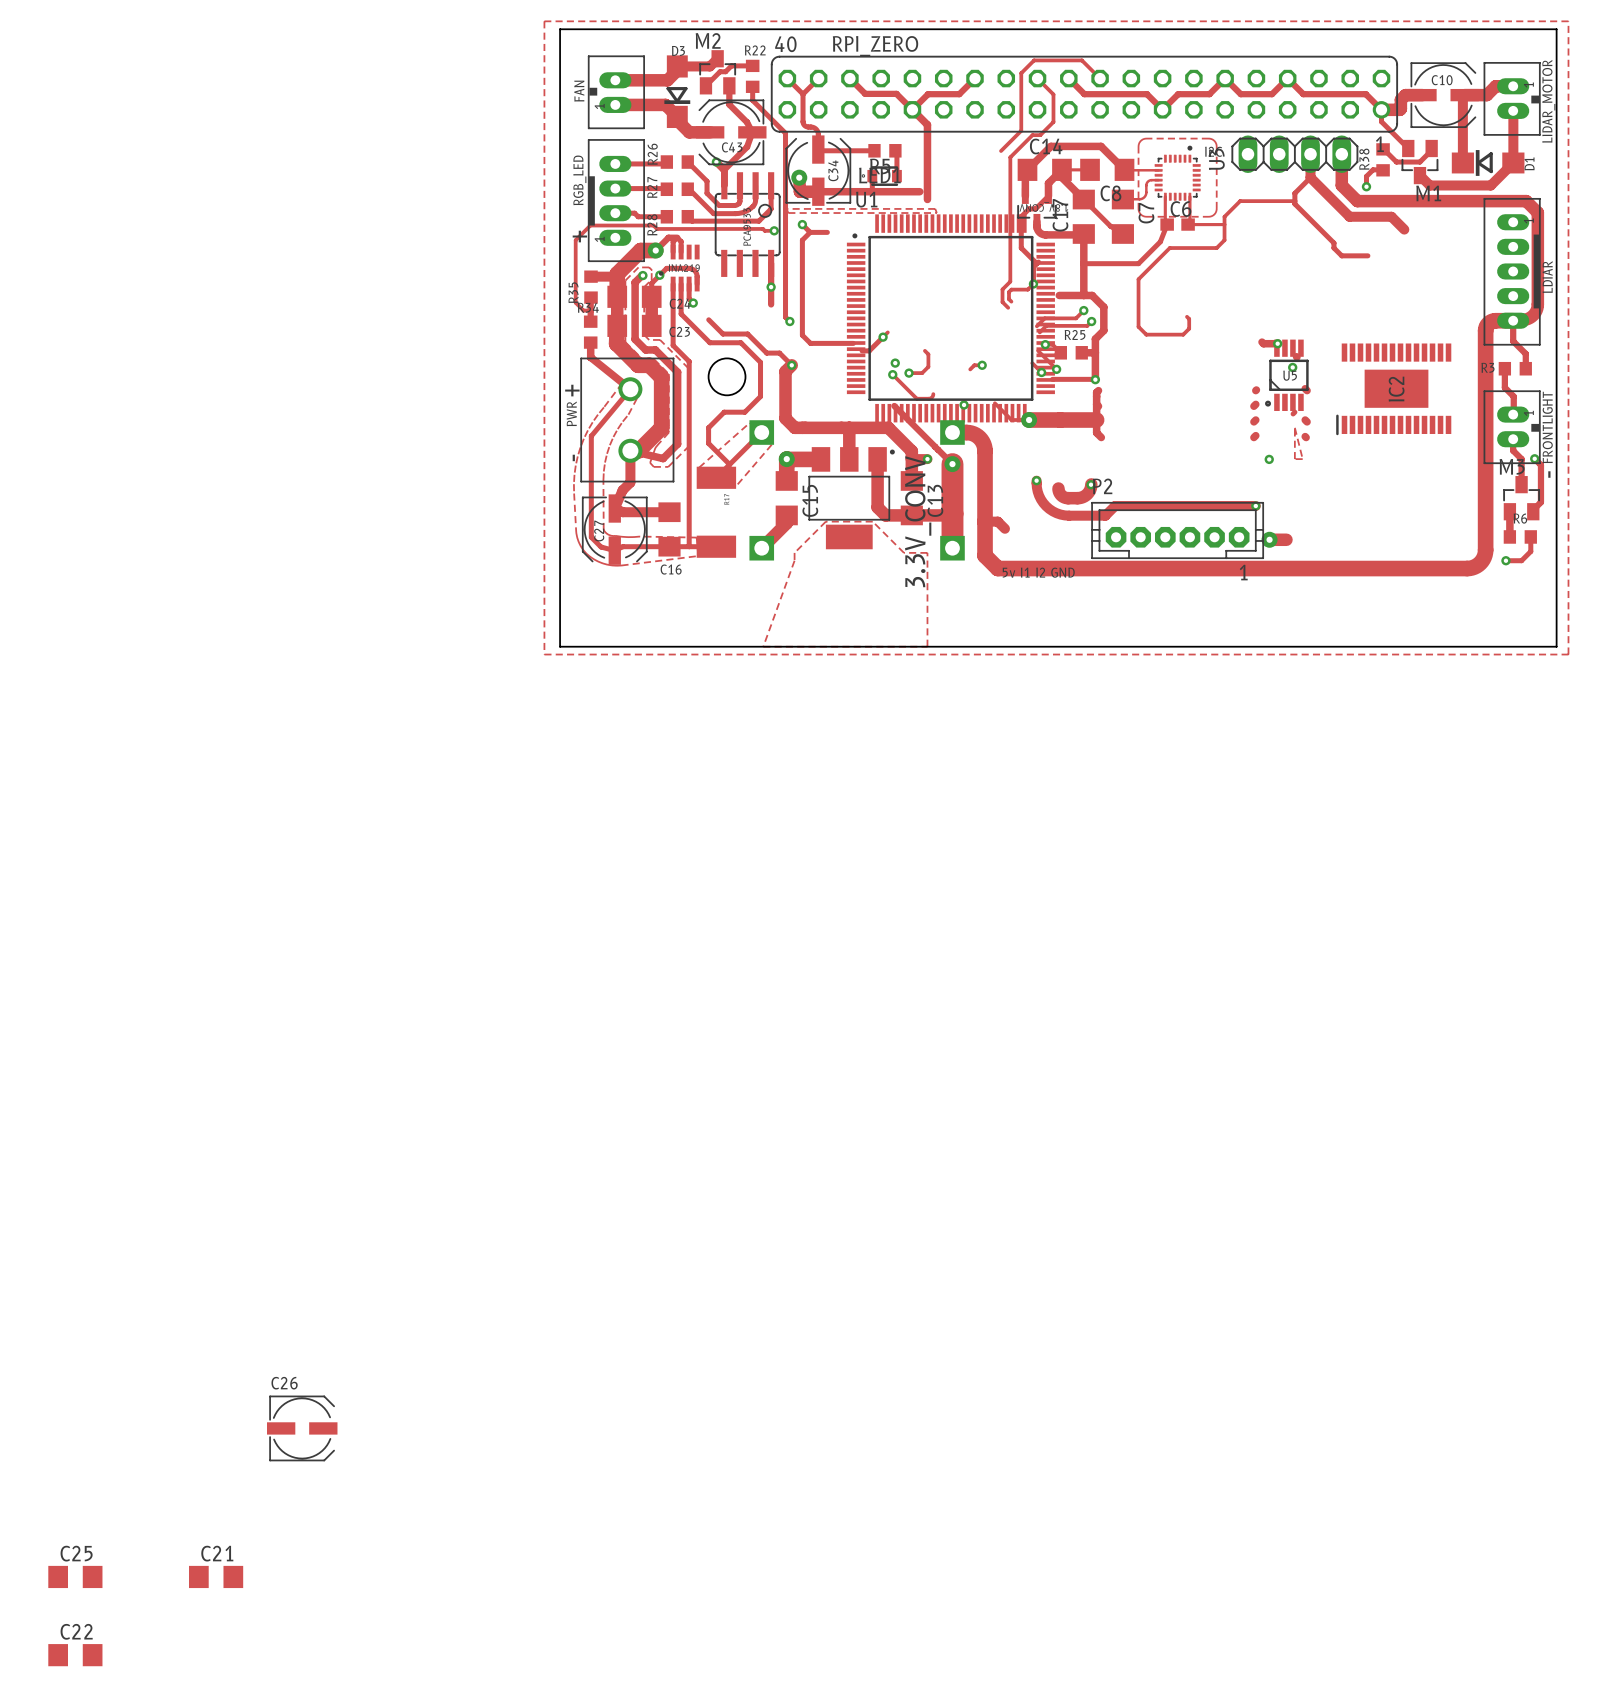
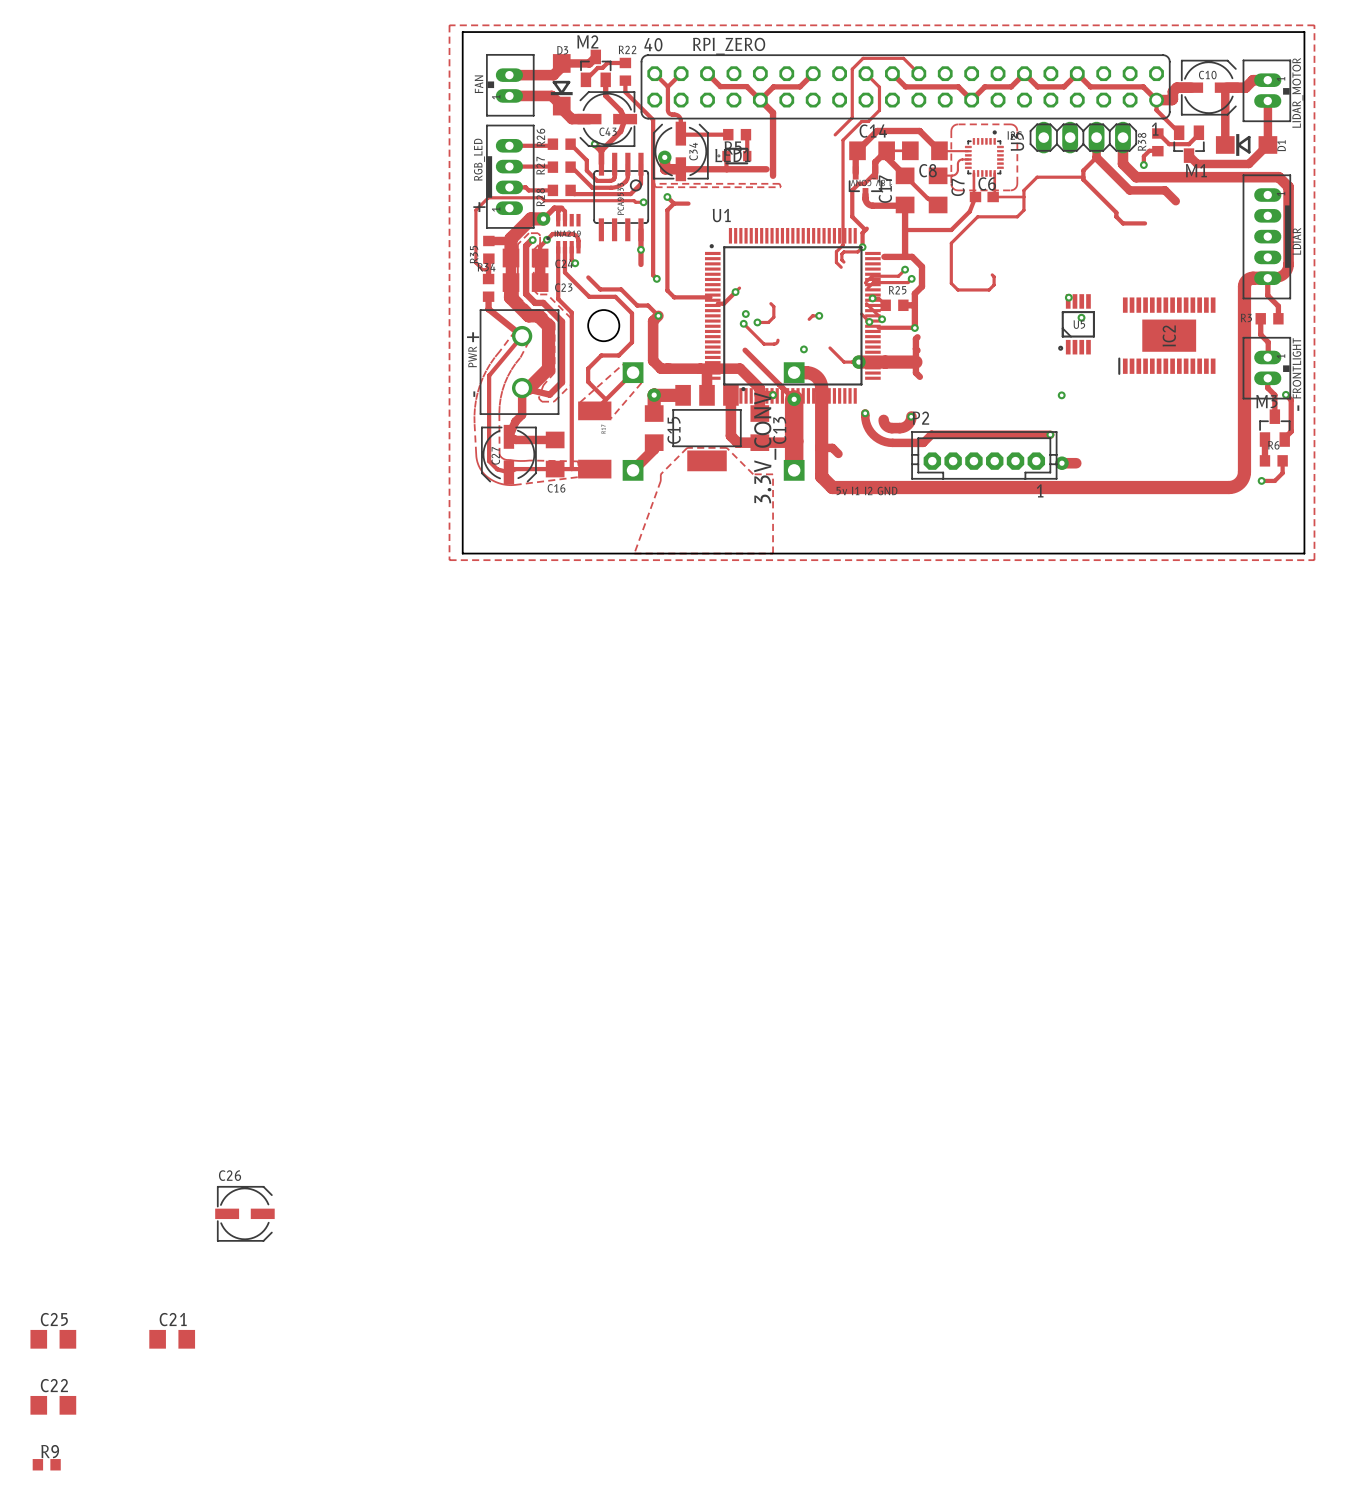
U1 position: (950, 318) -> (792, 315)
track: (1262, 342) (1277, 343) -> none
track: (1296, 356) (1296, 357) -> none
track: (1305, 388) (1307, 390) -> none
track: (1256, 389) (1255, 390) -> none
track: (1255, 404) (1253, 406) -> none
track: (1294, 412) (1293, 413) -> none
track: (1255, 420) (1253, 421) -> none
track: (1305, 420) (1307, 421) -> none
zone outline: (1294, 427) (1294, 459) (1302, 459) (1294, 427) -> none
track: (1255, 435) (1253, 437) -> none
track: (1305, 436) (1306, 437) -> none

